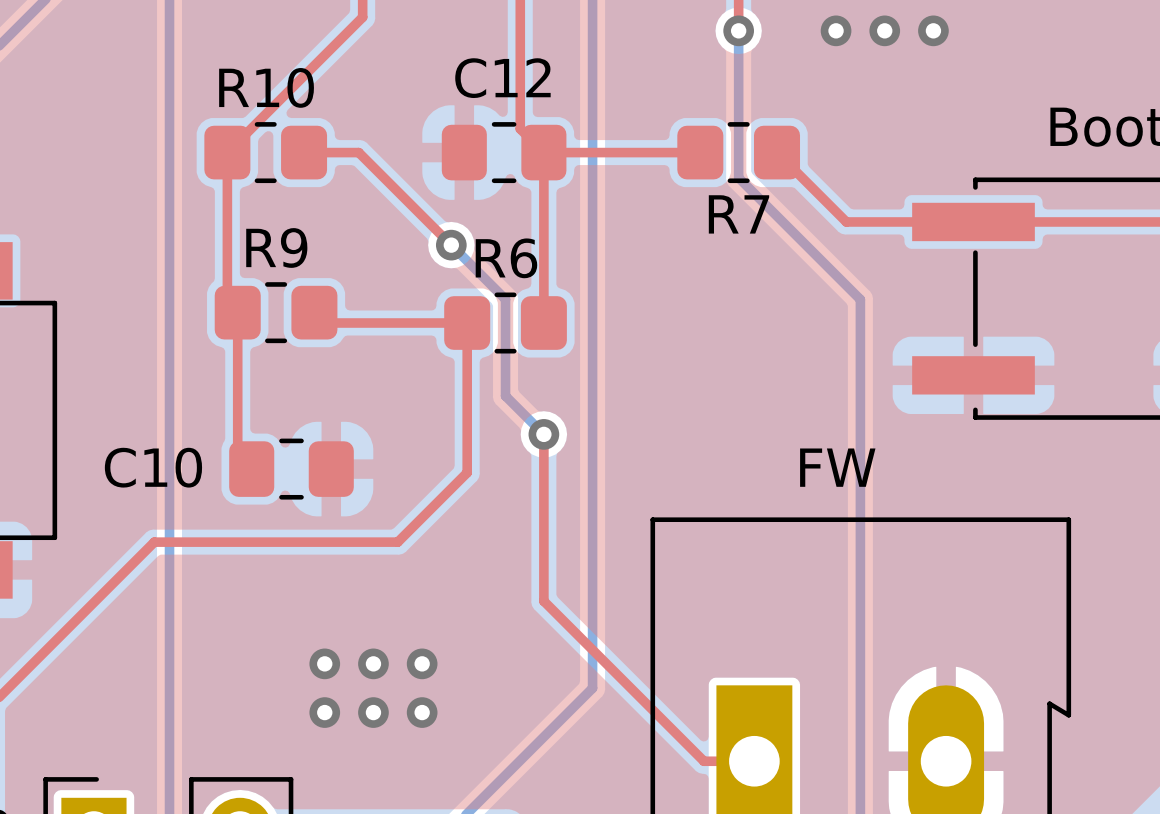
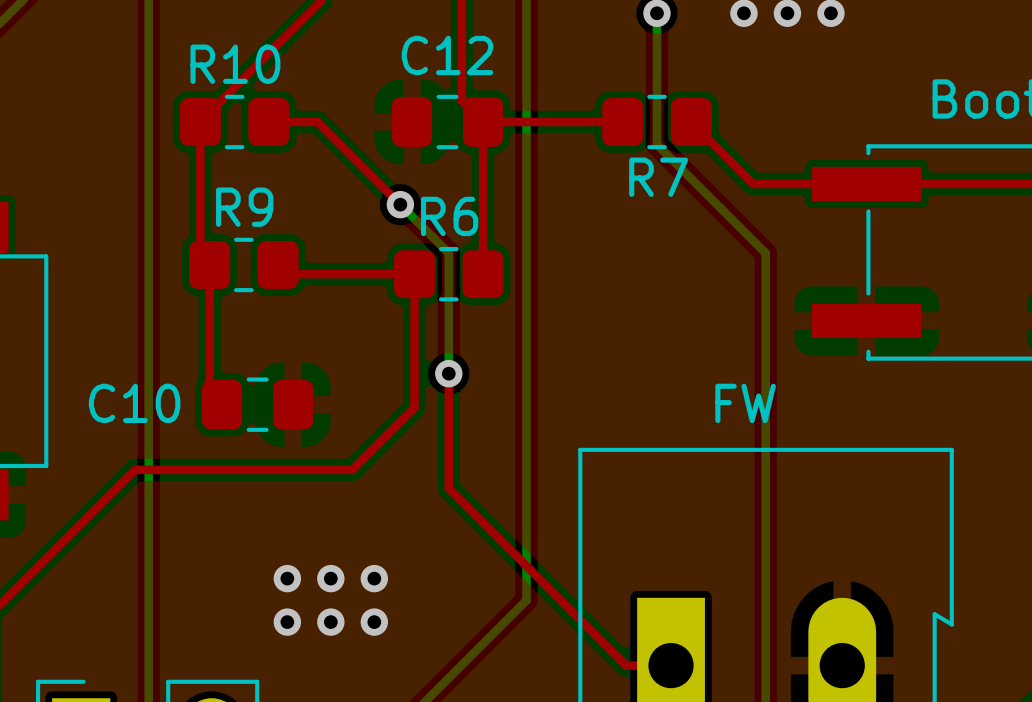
bottom track: (505, 396) (543, 434) -> (448, 339) (448, 373)
top track: (543, 434) (543, 601) -> (448, 373) (448, 488) (483, 522)
via position: (543, 434) -> (448, 373)

